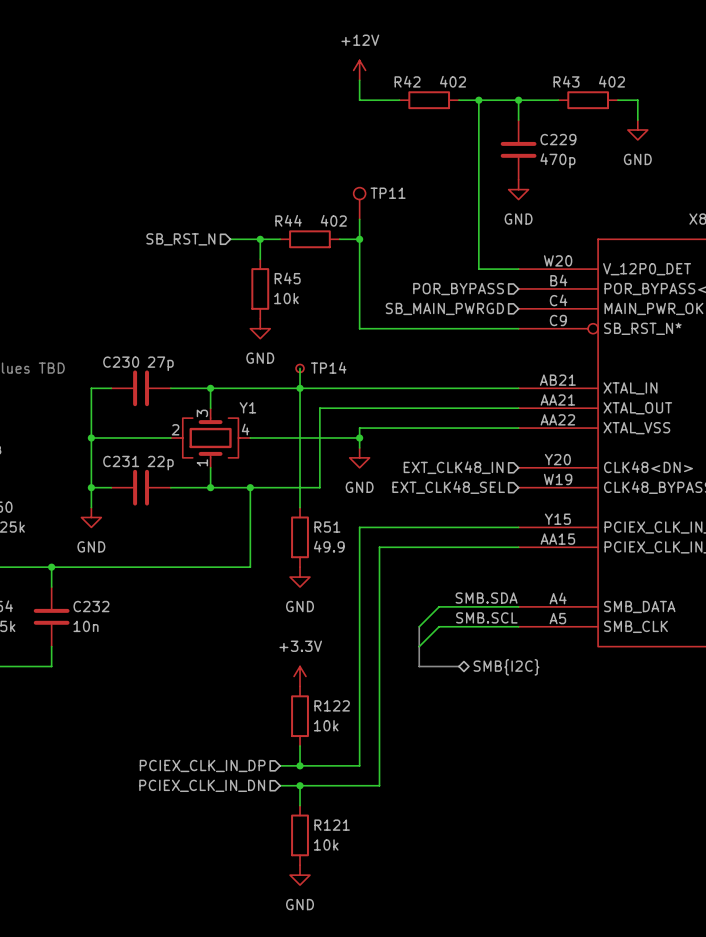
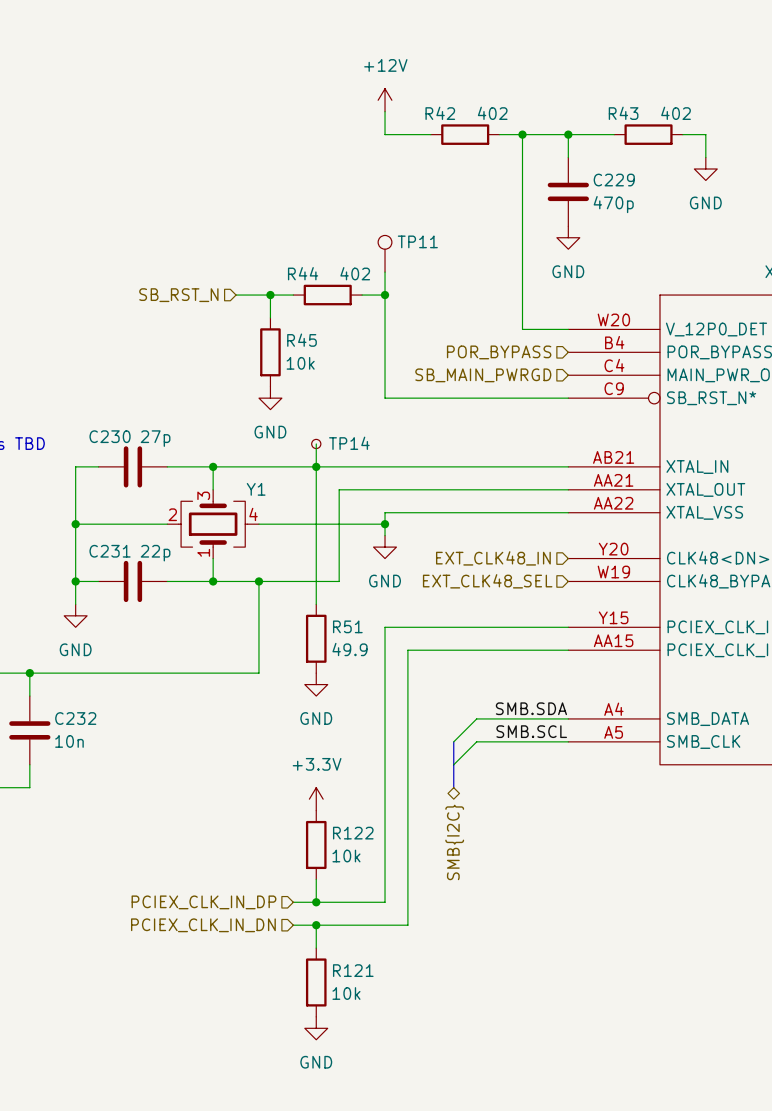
bus: (419, 666) (458, 666) -> none
hierarchical label rotation: 0° (506, 667) -> 90° clockwise (454, 842)
hierarchical label position: SMB{I2C} (506, 667) -> SMB{I2C} (454, 842)

